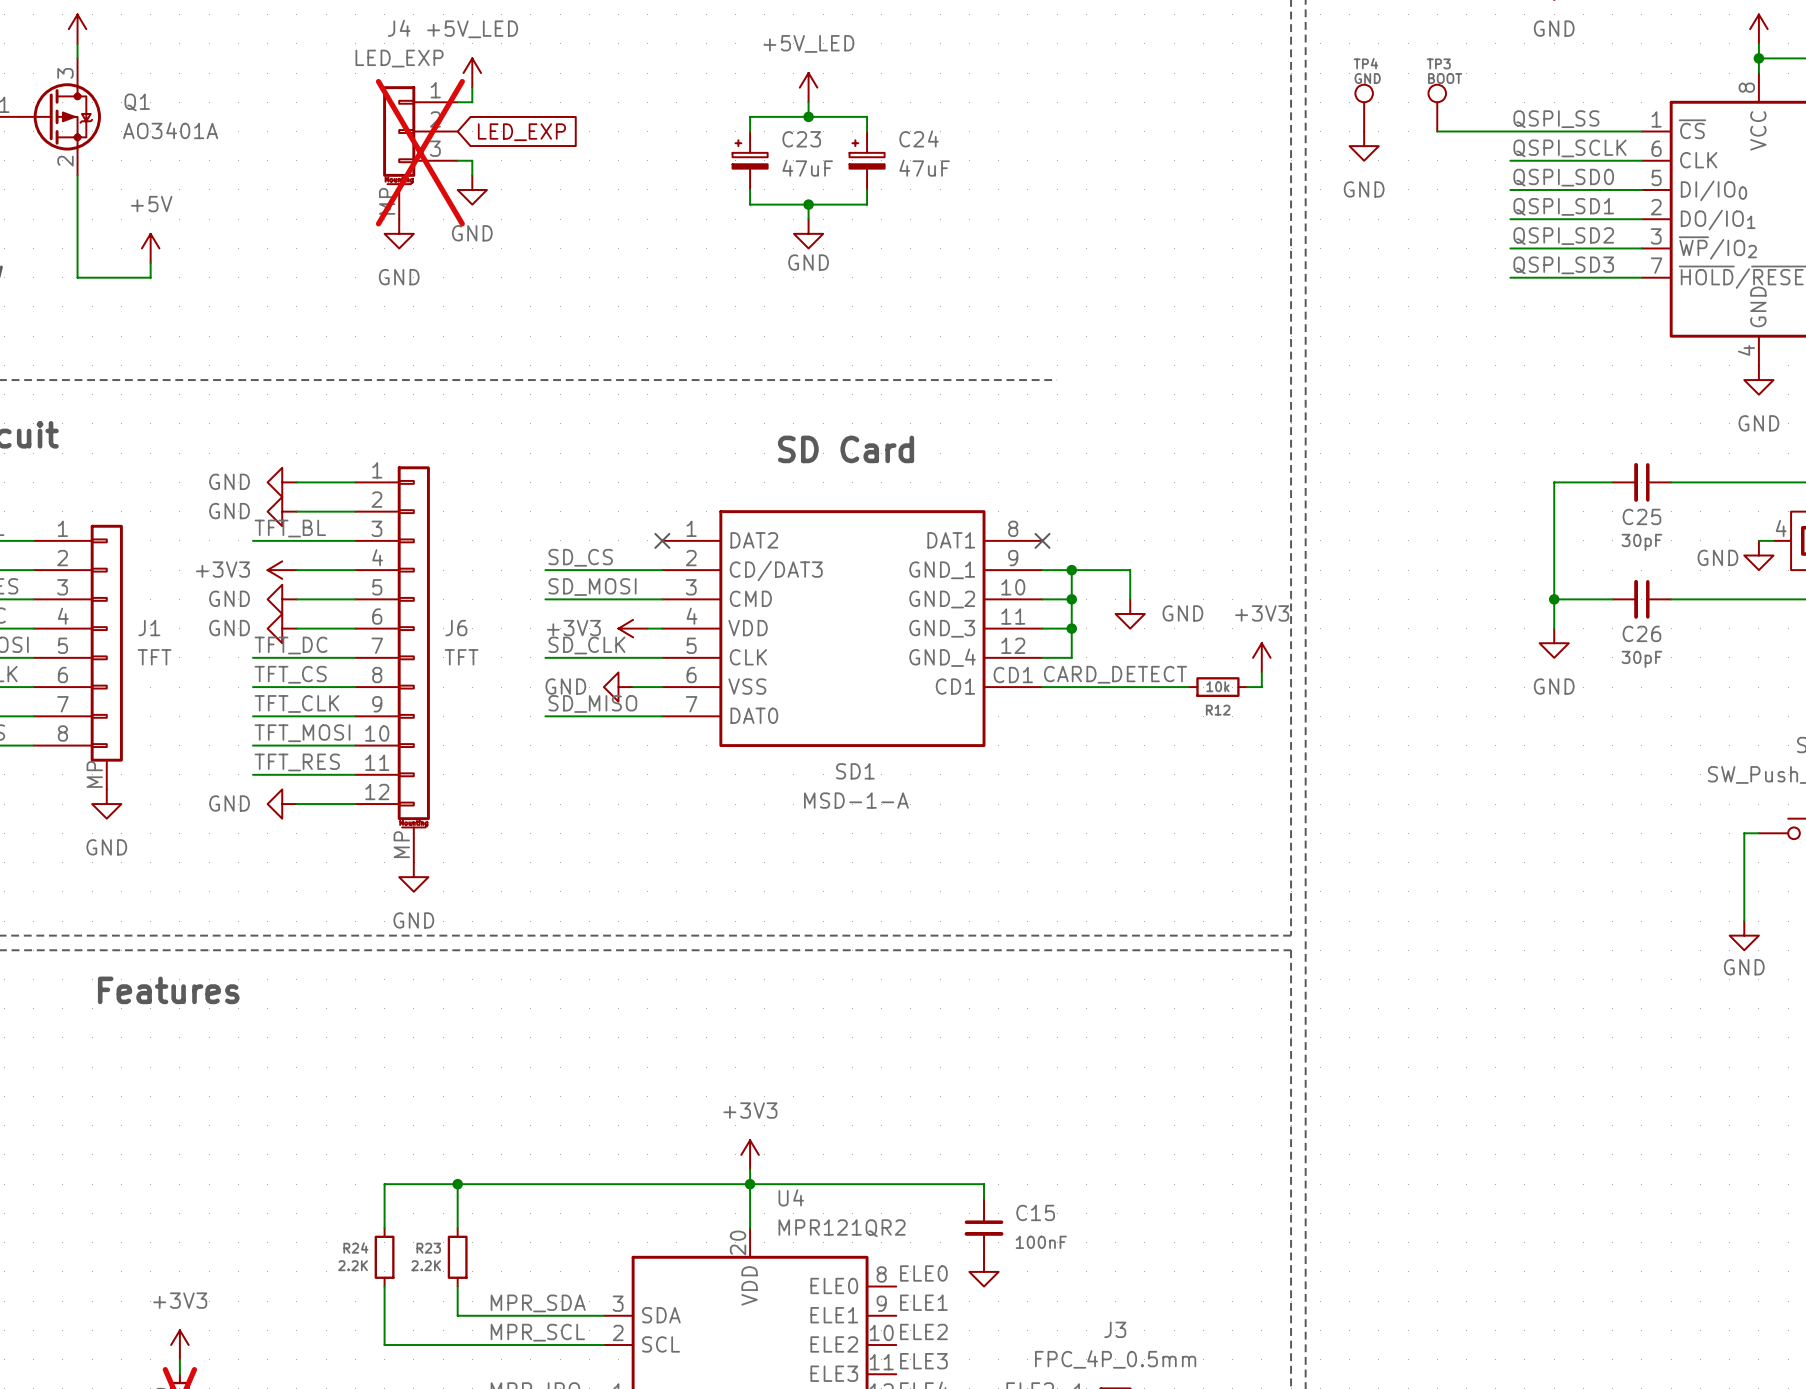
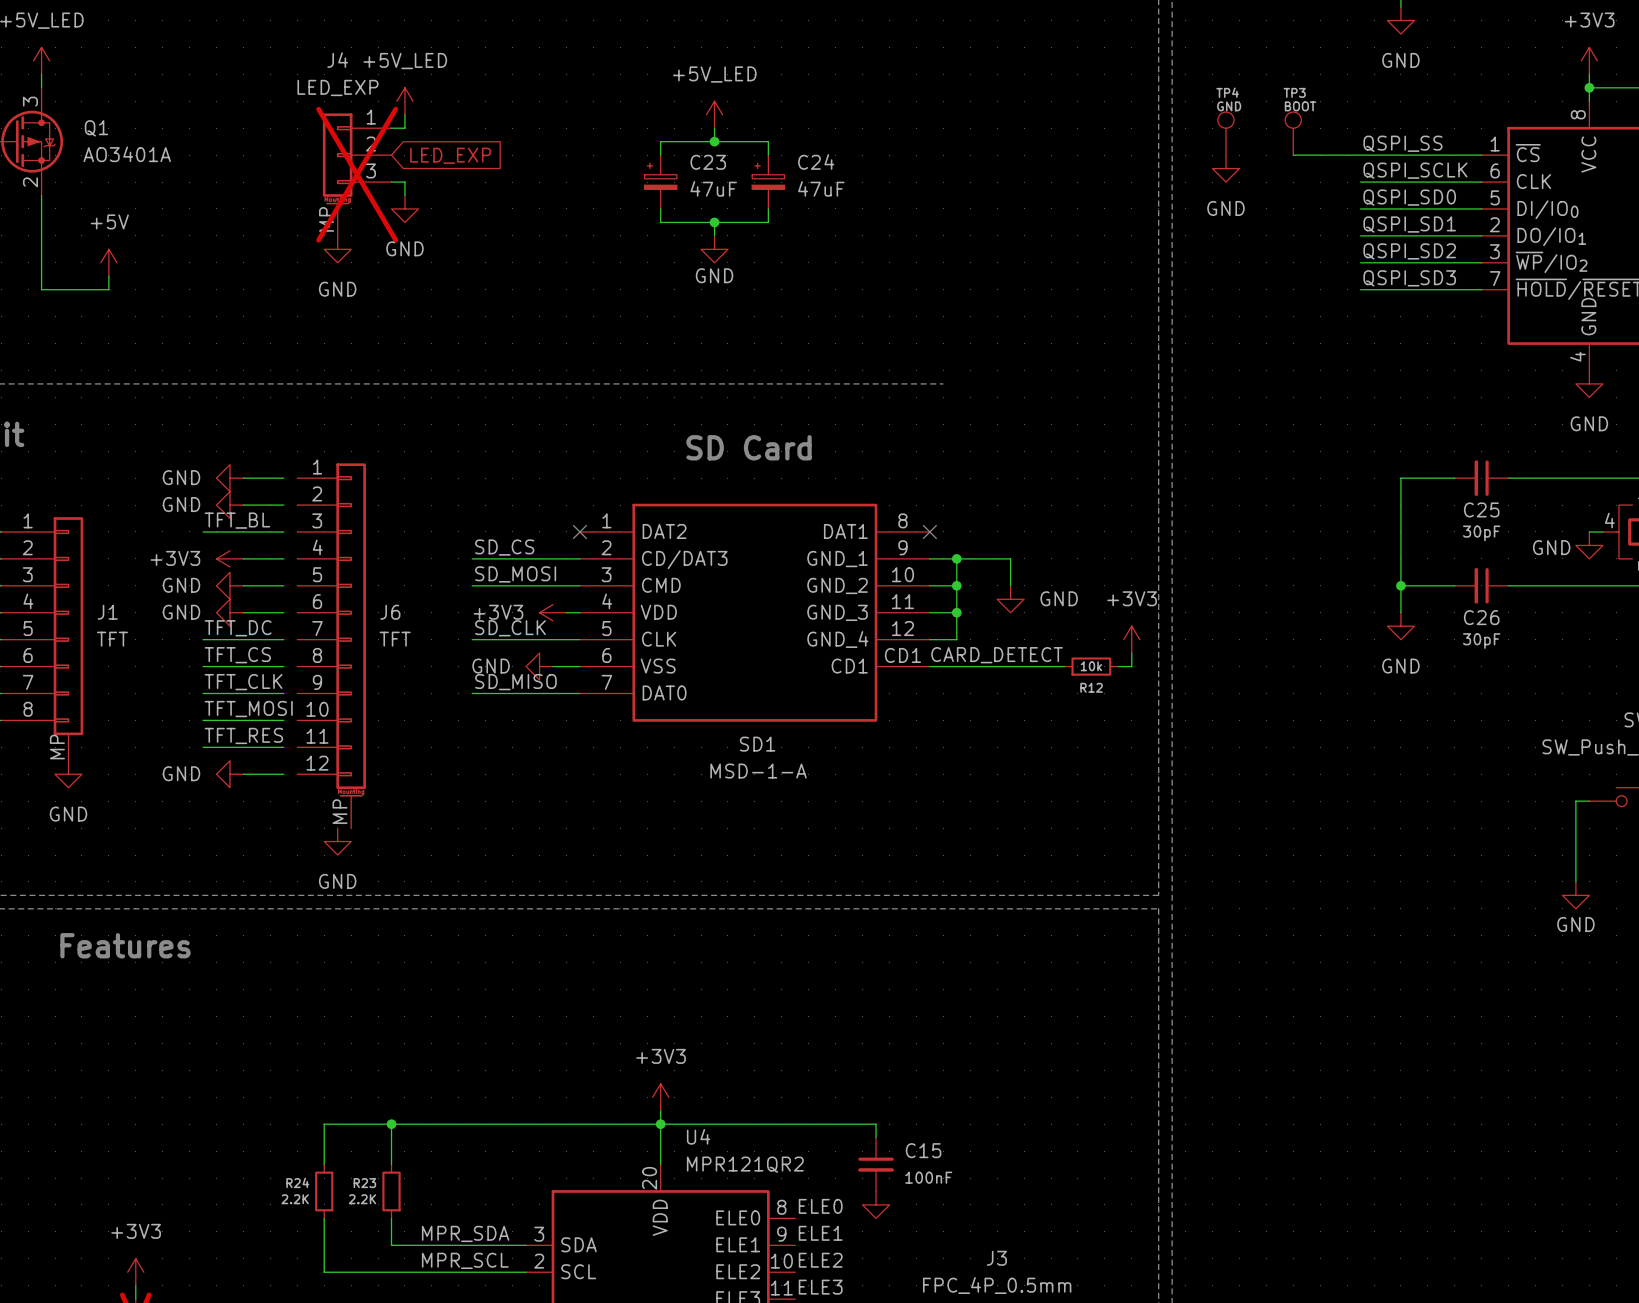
wire: (340, 482) (355, 482) -> none
wire: (340, 511) (355, 511) -> none
wire: (340, 540) (355, 540) -> none
wire: (340, 570) (355, 570) -> none
wire: (340, 599) (355, 599) -> none
wire: (340, 628) (355, 628) -> none
wire: (340, 657) (355, 657) -> none
wire: (340, 687) (355, 687) -> none
wire: (340, 716) (355, 716) -> none
wire: (340, 745) (355, 745) -> none
wire: (340, 774) (355, 774) -> none
wire: (340, 804) (355, 804) -> none
power symbol position: GND (413, 877) -> GND (337, 841)

